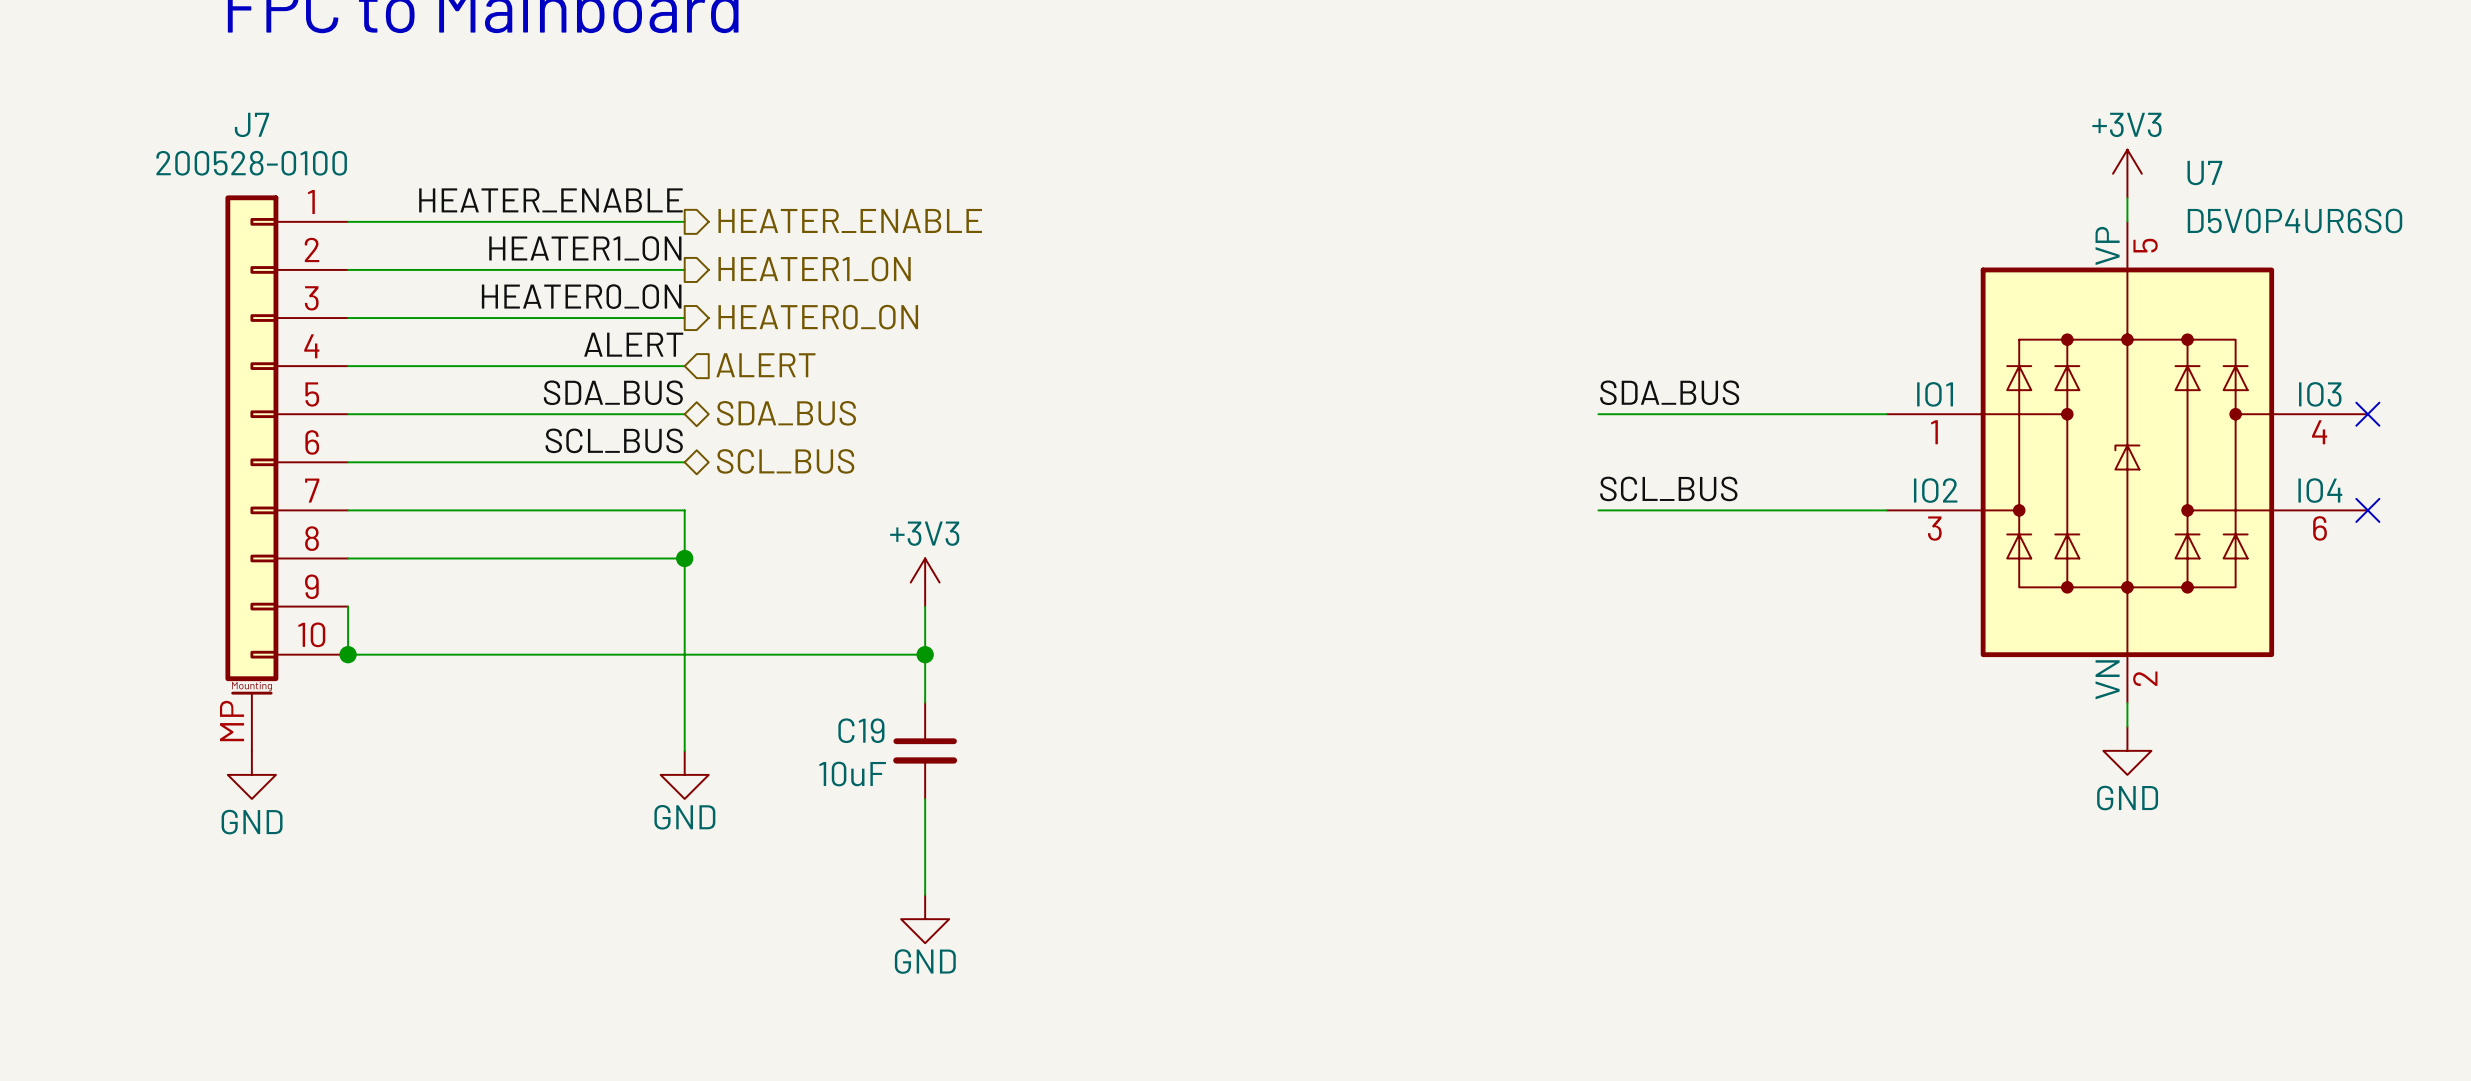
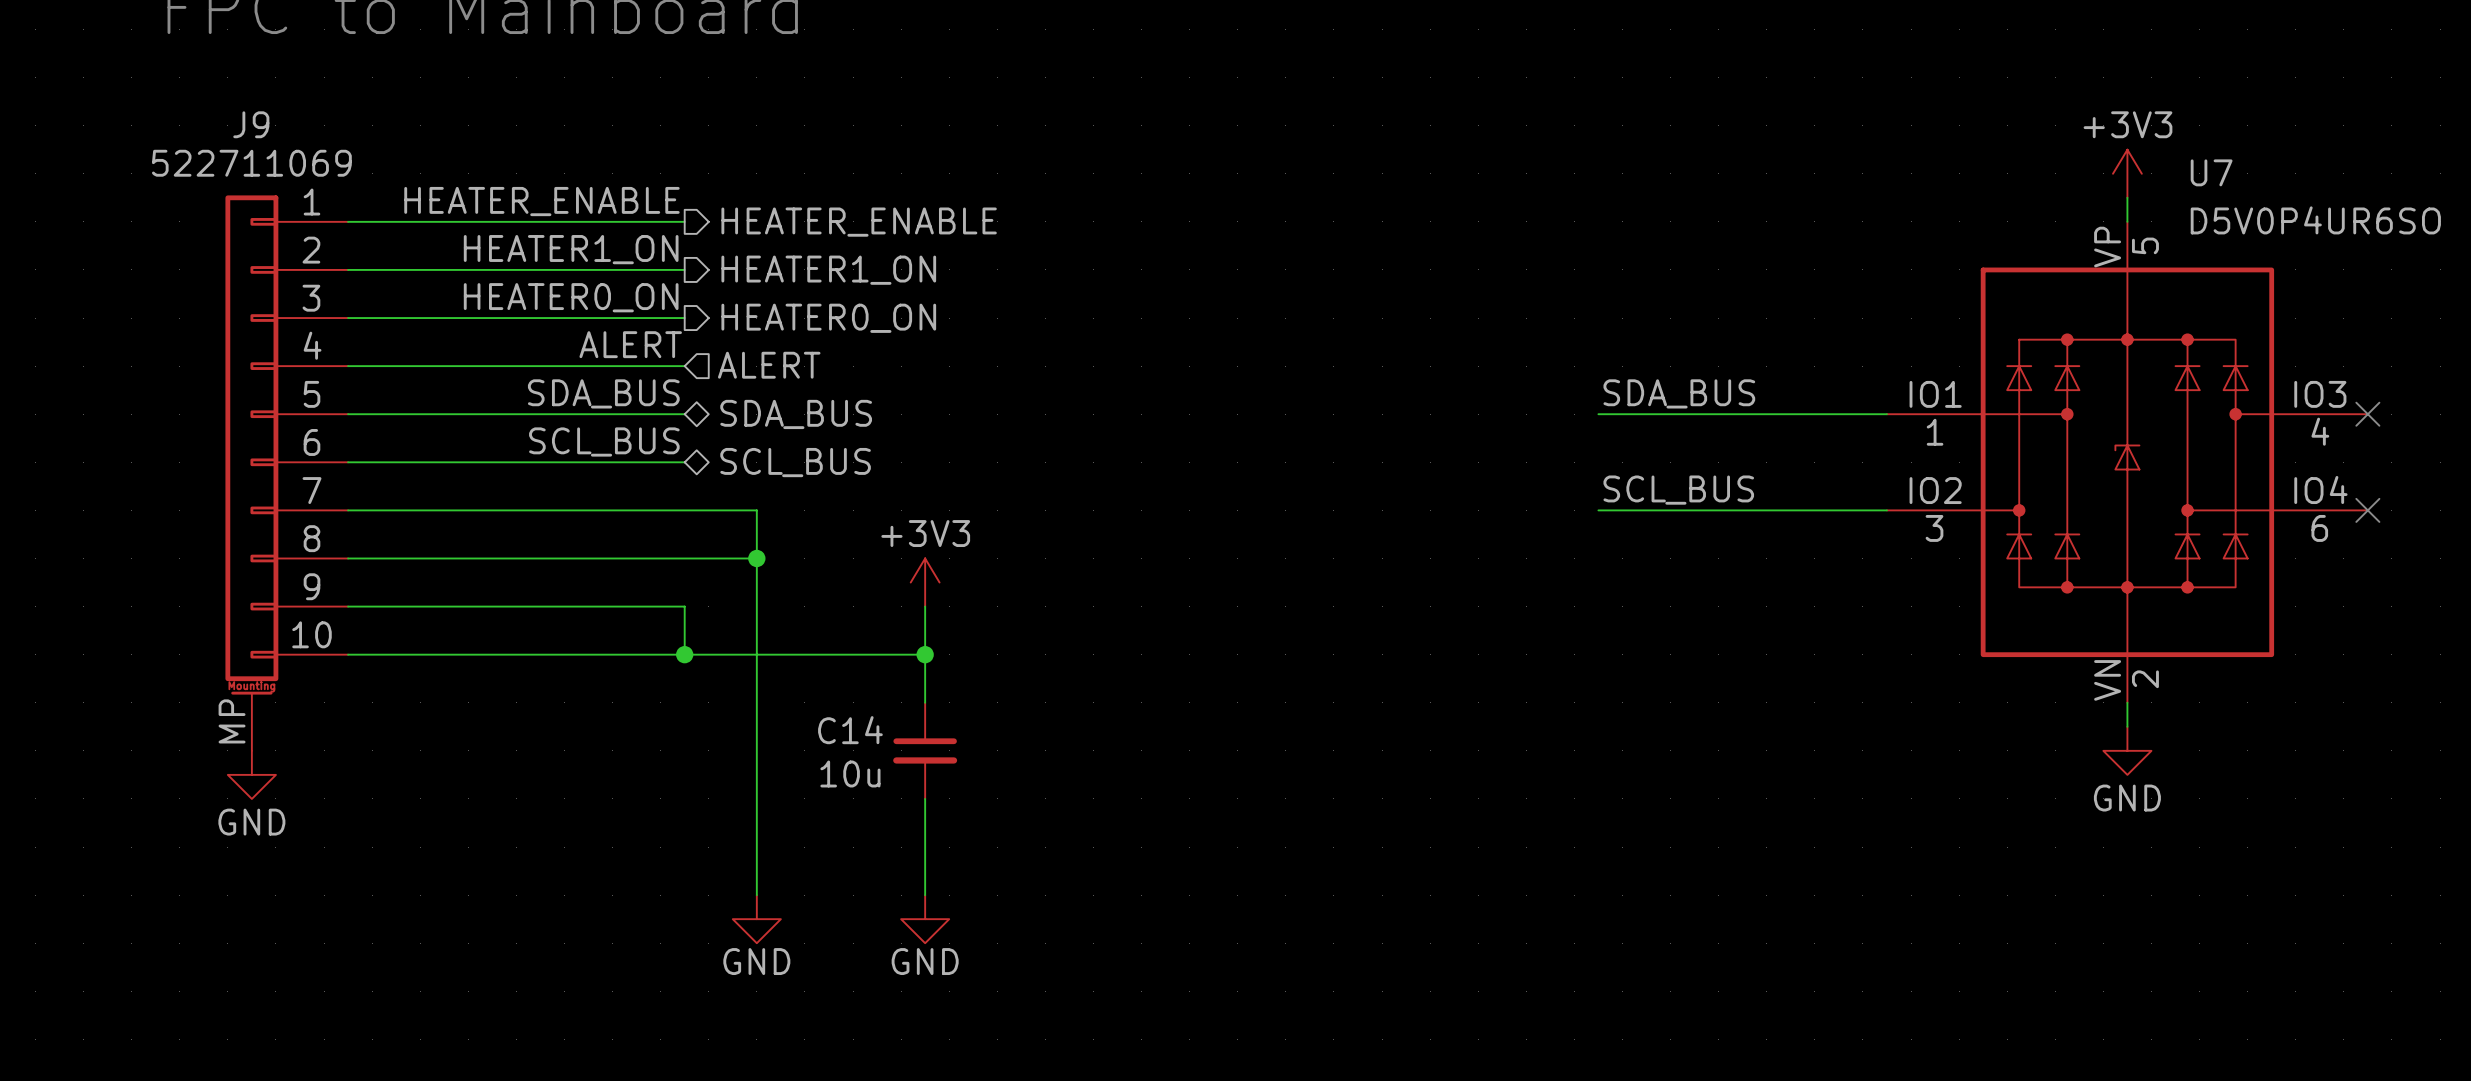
J7 name: J7 (252, 124) -> J9 (251, 124)
J7 value: 200528-0100 (251, 163) -> 522711069 (251, 163)
wire: (684, 510) (684, 606) -> (684, 510) (756, 510) (756, 895)
wire: none -> (684, 558) (756, 558)
junction: (684, 558) -> none
junction: none -> (756, 558)
wire: (348, 606) (348, 654) -> (348, 606) (684, 606)
junction: (348, 654) -> none
wire: (684, 654) (684, 750) -> none
junction: none -> (684, 654)
C19 name: C19 (861, 730) -> C14 (850, 730)
power symbol position: GND (684, 774) -> GND (756, 919)
C19 value: 10uF (852, 774) -> 10u (850, 773)

